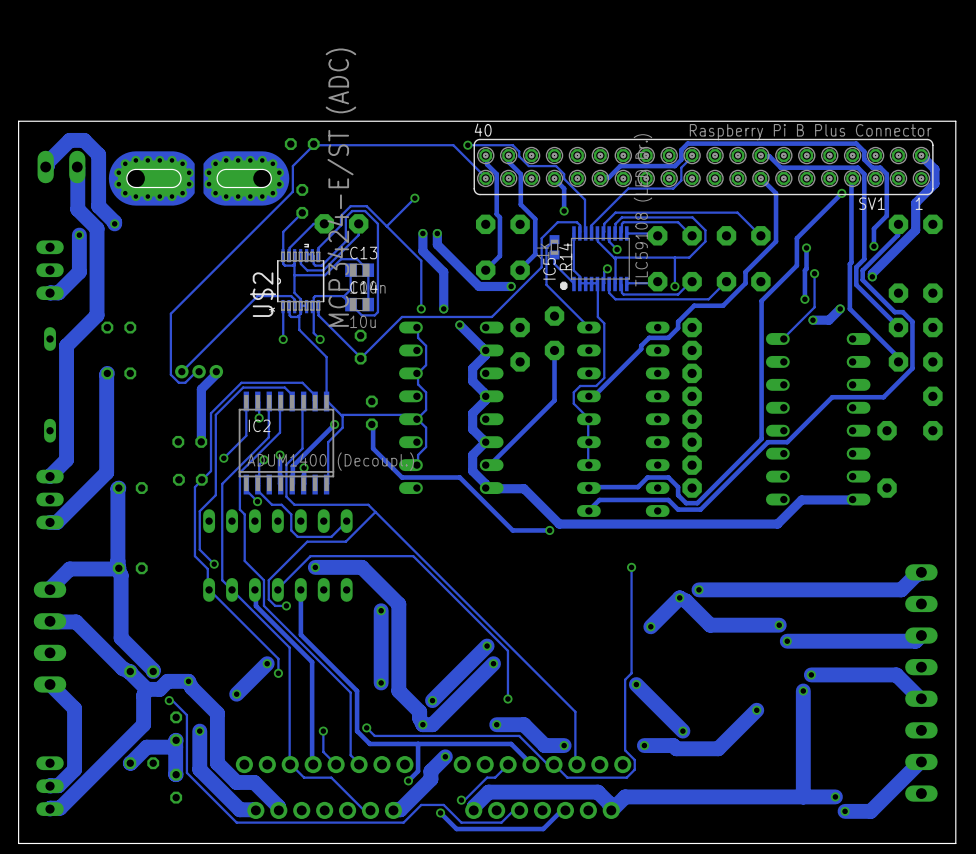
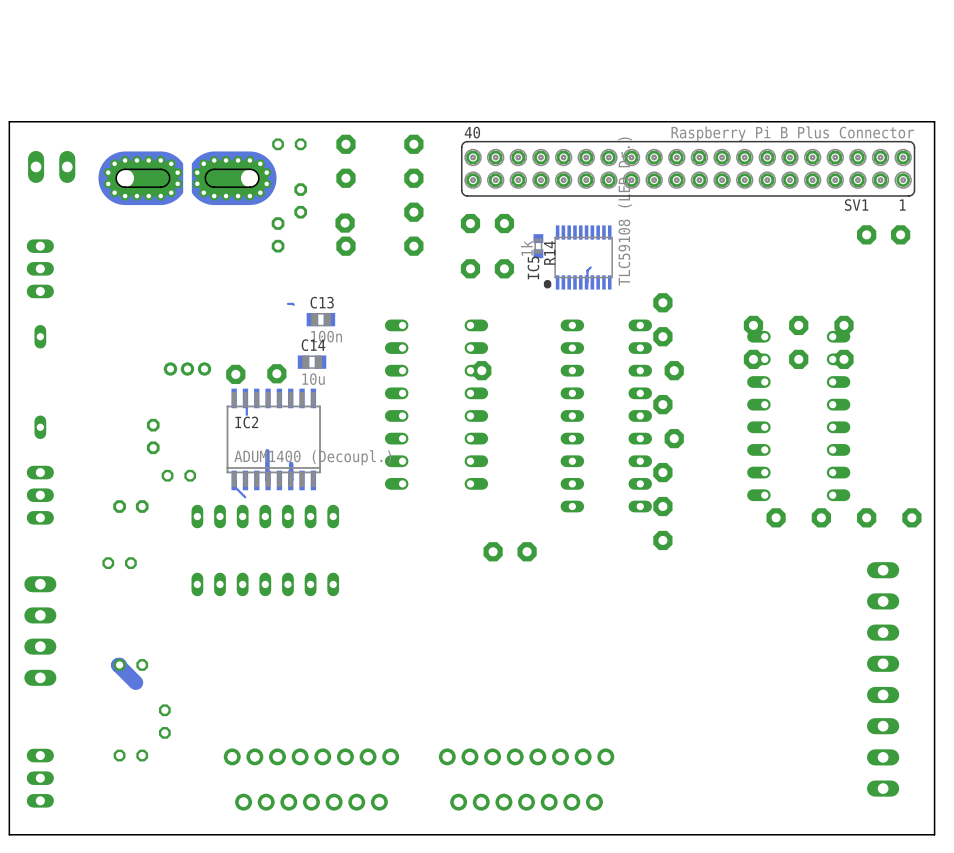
SV1 footprint: [473, 138, 934, 196] -> [461, 140, 916, 197]
part: none -> (345, 144)
part: none -> (413, 144)
track: (313, 145) (453, 145) (485, 178) -> none
track: (313, 145) (292, 166) (292, 191) (170, 313) (170, 374) (178, 382) (185, 382) (199, 371) -> none
track: (467, 145) (512, 145) (519, 151) (519, 156) (528, 166) (556, 166) (564, 174) (564, 178) (585, 199) (585, 233) -> none
via: (467, 145) -> none
track: (485, 155) (487, 164) (496, 174) (496, 214) (499, 217) (499, 255) (485, 270) -> none
track: (508, 155) (509, 162) (520, 174) (520, 204) (535, 219) (535, 254) (520, 270) -> none
track: (692, 155) (681, 167) (681, 180) (673, 188) (628, 188) (591, 225) (591, 233) -> none
track: (760, 155) (769, 156) (780, 167) (857, 167) (864, 174) (864, 259) (856, 267) (856, 284) (898, 327) -> none
track: (921, 155) (934, 169) (934, 183) (915, 203) (915, 230) (872, 273) (872, 276) -> none
track: (45, 167) (47, 162) (69, 140) (84, 140) (98, 154) (98, 206) (114, 223) -> none
track: (77, 167) (77, 209) (97, 228) (97, 315) (66, 345) (66, 459) (50, 476) -> none
part: none -> (345, 178)
part: none -> (413, 178)
track: (554, 178) (564, 188) (564, 211) -> none
track: (600, 178) (609, 177) (620, 166) (674, 166) (681, 159) (681, 150) (687, 143) (856, 143) (864, 151) (864, 159) (872, 167) (880, 167) (886, 174) (886, 215) (873, 228) (873, 246) -> none
track: (760, 178) (776, 193) (776, 241) (745, 272) (745, 283) (723, 305) (694, 305) (678, 321) (678, 328) (668, 337) (649, 337) (641, 345) (641, 349) (594, 395) (588, 396) -> none
track: (852, 178) (849, 308) (898, 357) (898, 361) -> none
track: (841, 193) (796, 238) (796, 265) (761, 300) (761, 438) (697, 503) (686, 503) (678, 495) (678, 487) (668, 477) (647, 477) (637, 487) (588, 488) -> none
via: (841, 193) -> none
track: (414, 198) (386, 226) -> none
via: (414, 198) -> none
part: (302, 201) -> none
part: none -> (300, 200)
via: (564, 211) -> none
track: (302, 212) (283, 231) (283, 264) (292, 265) (294, 255) -> none
part: none -> (413, 212)
via: (114, 223) -> none
track: (324, 223) (313, 223) (289, 247) (288, 255) -> none
part: (324, 223) -> none
track: (358, 223) (358, 235) (323, 270) (307, 270) (300, 264) (300, 255) -> none
track: (898, 224) (898, 235) (862, 270) (862, 280) (894, 312) (902, 312) (912, 321) (912, 368) (883, 397) (832, 397) (787, 442) (768, 442) (700, 509) (678, 509) (668, 499) (599, 499) (588, 510) -> none
part: (898, 224) -> none
part: (932, 224) -> none
track: (422, 233) (422, 251) (443, 272) (443, 308) -> none
via: (422, 233) -> none
track: (437, 233) (437, 244) (479, 286) (511, 286) -> none
via: (437, 233) -> none
track: (573, 233) (573, 270) (580, 276) (580, 283) -> none
track: (579, 233) (580, 225) (576, 222) (557, 222) (541, 238) (541, 267) (491, 316) (402, 316) (360, 358) (318, 315) (318, 306) -> none
track: (597, 233) (597, 241) (615, 259) (615, 284) -> none
track: (603, 233) (604, 223) (615, 212) (737, 212) (760, 235) -> none
track: (609, 233) (609, 241) (617, 249) -> none
track: (615, 233) (615, 223) (621, 217) (692, 217) (705, 230) (705, 241) (689, 257) (614, 258) -> none
track: (620, 233) (623, 222) (678, 222) (692, 235) -> none
track: (626, 233) (655, 233) (657, 235) -> none
track: (79, 235) (79, 272) (58, 292) (50, 293) -> none
via: (79, 235) -> none
part: none -> (278, 234)
part: (657, 235) -> none
part: (692, 235) -> none
part: (726, 235) -> none
part: (760, 235) -> none
part: none -> (866, 234)
part: none -> (900, 234)
track: (554, 239) (546, 247) (546, 284) (588, 327) -> none
via: (873, 246) -> none
part: none -> (345, 246)
part: none -> (413, 246)
track: (806, 247) (804, 299) -> none
via: (806, 247) -> none
via: (617, 249) -> none
track: (554, 254) (554, 264) (573, 284) -> none
track: (306, 255) (312, 254) (313, 264) (321, 265) (345, 241) (345, 217) (352, 211) (365, 211) (377, 223) (377, 312) (374, 315) (361, 315) (342, 296) (315, 296) (312, 306) (313, 333) (320, 339) -> none
track: (318, 255) (318, 247) (341, 225) (341, 215) (350, 206) (366, 206) (421, 260) (421, 308) -> none
track: (674, 257) (674, 286) -> none
track: (293, 264) (294, 292) (300, 299) (300, 313) (297, 316) (291, 316) (288, 306) -> none
via: (607, 268) -> none
track: (351, 270) (350, 289) (343, 296) -> none
C13 position: (359, 270) -> (320, 319)
track: (814, 273) (814, 307) (783, 338) -> none
via: (814, 273) -> none
track: (294, 275) (324, 275) (341, 259) (357, 259) (368, 270) (368, 304) -> none
via: (872, 276) -> none
U$2: MCP3424-E/ST (ADC) (300, 278) -> none
track: (657, 281) (626, 284) -> none
part: (657, 281) -> none
track: (692, 281) (678, 294) (623, 294) (620, 284) -> none
part: (692, 281) -> none
track: (726, 281) (708, 299) (615, 299) (609, 292) (609, 284) -> none
part: (726, 281) -> none
part: (760, 281) -> none
track: (580, 283) (597, 284) (597, 316) (604, 323) (604, 377) (596, 386) (580, 386) (573, 392) (573, 403) (588, 419) (588, 465) -> none
via: (511, 286) -> none
via: (674, 286) -> none
part: (898, 293) -> none
part: (932, 293) -> none
via: (804, 299) -> none
C14 position: (359, 304) -> (312, 362)
part: none -> (662, 302)
track: (283, 306) (283, 339) -> none
track: (294, 306) (294, 299) (291, 296) (257, 296) (181, 371) -> none
via: (421, 308) -> none
via: (443, 308) -> none
track: (840, 308) (829, 320) (812, 320) -> none
via: (840, 308) -> none
track: (298, 316) (299, 329) (326, 357) (326, 401) (342, 416) (342, 427) (328, 442) (328, 483) (326, 484) -> none
part: (554, 316) -> none
via: (812, 320) -> none
track: (459, 325) (485, 350) (485, 355) (472, 368) (472, 381) (485, 396) (485, 400) (472, 413) (472, 429) (485, 442) (472, 455) (472, 471) (485, 483) (485, 488) (524, 488) (559, 524) (777, 524) (801, 499) (852, 499) -> none
via: (459, 325) -> none
part: (118, 327) -> none
track: (416, 327) (418, 337) (426, 345) (426, 365) (416, 373) (418, 384) (426, 392) (426, 410) (416, 419) -> none
part: (520, 327) -> none
part: (692, 327) -> none
part: none -> (753, 325)
part: none -> (798, 325)
part: none -> (844, 325)
part: (898, 327) -> none
part: (932, 327) -> none
part: none -> (662, 336)
via: (283, 339) -> none
via: (320, 339) -> none
part: (360, 347) -> none
track: (554, 350) (554, 400) (490, 464) (485, 465) -> none
part: (554, 350) -> none
part: (692, 350) -> none
part: (520, 361) -> none
part: none -> (753, 359)
part: none -> (798, 359)
part: none -> (844, 359)
part: (898, 361) -> none
part: (932, 361) -> none
track: (216, 371) (217, 373) (201, 389) (201, 441) -> none
track: (107, 373) (106, 472) (56, 522) (50, 522) -> none
part: (118, 373) -> none
part: none -> (481, 370)
part: none -> (276, 373)
part: none -> (235, 374)
part: (692, 396) -> none
part: (932, 396) -> none
track: (246, 401) (246, 435) (223, 458) -> none
track: (269, 401) (268, 437) (222, 483) (222, 580) (231, 589) -> none
track: (280, 401) (280, 432) (239, 472) (239, 509) (244, 514) (244, 560) (263, 580) (263, 605) (350, 692) (350, 755) (359, 764) -> none
track: (292, 401) (291, 394) (284, 387) (243, 387) (215, 414) (215, 495) (199, 511) (199, 549) (214, 564) -> none
track: (303, 401) (302, 448) (286, 464) (286, 496) (294, 504) (368, 504) (575, 711) (576, 764) -> none
track: (315, 401) (313, 394) (302, 382) (241, 382) (211, 413) (211, 471) (194, 487) (194, 556) (207, 568) (207, 589) (278, 658) (278, 673) -> none
part: none -> (662, 404)
part: (371, 412) -> none
track: (341, 415) (413, 414) (416, 419) -> none
via: (259, 418) -> none
track: (416, 419) (426, 427) (426, 446) (418, 455) (416, 465) -> none
part: (692, 419) -> none
track: (334, 424) (292, 466) (292, 484) -> none
via: (334, 424) -> none
track: (371, 424) (373, 448) (402, 477) (459, 477) (512, 530) (549, 530) -> none
part: (887, 430) -> none
part: (932, 430) -> none
part: none -> (153, 436)
part: (189, 441) -> none
via: (280, 455) -> none
via: (223, 458) -> none
track: (263, 459) (259, 464) (259, 491) (272, 504) (281, 504) (291, 514) (291, 530) (297, 536) (331, 536) (346, 521) -> none
via: (263, 459) -> none
part: (692, 465) -> none
via: (304, 467) -> none
part: none -> (662, 472)
track: (118, 488) (117, 568) -> none
part: (130, 488) -> none
part: (692, 488) -> none
part: (887, 488) -> none
via: (257, 501) -> none
part: none -> (130, 506)
part: none -> (662, 506)
track: (375, 512) (345, 541) (307, 541) (268, 580) (268, 599) (275, 605) (286, 605) -> none
part: none -> (776, 517)
part: none -> (821, 517)
part: none -> (866, 517)
part: none -> (911, 517)
via: (549, 530) -> none
part: none -> (662, 540)
part: none -> (493, 551)
part: none -> (527, 551)
via: (214, 564) -> none
track: (315, 567) (361, 567) (398, 604) (398, 690) (419, 711) (419, 718) (422, 724) (432, 724) (493, 663) -> none
via: (315, 567) -> none
track: (631, 567) (631, 673) (625, 679) (625, 750) (634, 760) (634, 769) (626, 777) (567, 777) (552, 763) (546, 763) (519, 735) (374, 735) (366, 727) -> none
via: (631, 567) -> none
track: (117, 568) (69, 568) (50, 589) -> none
track: (117, 568) (121, 575) (121, 638) (153, 671) -> none
track: (921, 572) (917, 573) (901, 589) (698, 589) -> none
track: (232, 589) (289, 647) (290, 764) (304, 777) (331, 777) (363, 809) (370, 810) -> none
track: (254, 589) (255, 605) (312, 662) (313, 764) -> none
track: (277, 589) (310, 556) (413, 556) (507, 650) (507, 699) -> none
track: (300, 589) (300, 634) (357, 690) (357, 731) (369, 743) (511, 743) (531, 764) -> none
via: (698, 589) -> none
via: (679, 597) -> none
via: (286, 605) -> none
track: (381, 610) (381, 682) -> none
via: (381, 610) -> none
track: (50, 621) (76, 621) (122, 668) (129, 671) -> none
track: (779, 625) (710, 625) (686, 601) (679, 597) (650, 626) -> none
via: (779, 625) -> none
via: (650, 626) -> none
track: (921, 635) (915, 641) (787, 641) -> none
via: (787, 641) -> none
track: (487, 646) (432, 700) -> none
via: (487, 646) -> none
track: (267, 663) (236, 694) -> none
via: (267, 663) -> none
via: (493, 663) -> none
via: (278, 673) -> none
track: (811, 674) (896, 674) (921, 698) -> none
via: (811, 674) -> none
via: (188, 681) -> none
via: (381, 682) -> none
part: (921, 682) -> none
track: (50, 684) (74, 708) (74, 769) (58, 785) (50, 786) -> none
track: (636, 684) (682, 731) -> none
via: (636, 684) -> none
part: none -> (883, 679)
track: (803, 690) (803, 796) -> none
via: (803, 690) -> none
via: (236, 694) -> none
via: (507, 699) -> none
track: (169, 700) (172, 700) (186, 715) (186, 772) (236, 822) (403, 822) (421, 804) (443, 804) (461, 822) (501, 822) (512, 811) (519, 810) -> none
via: (169, 700) -> none
via: (432, 700) -> none
track: (756, 710) (718, 748) (676, 748) (673, 745) (644, 745) -> none
via: (756, 710) -> none
via: (422, 724) -> none
track: (496, 724) (524, 724) (544, 745) (564, 745) -> none
via: (496, 724) -> none
via: (366, 727) -> none
track: (199, 731) (199, 769) (239, 809) (255, 810) -> none
via: (199, 731) -> none
track: (323, 731) (323, 751) (336, 764) -> none
via: (323, 731) -> none
via: (682, 731) -> none
track: (176, 740) (176, 774) -> none
track: (418, 743) (418, 771) (408, 780) -> none
via: (564, 745) -> none
via: (644, 745) -> none
track: (175, 747) (146, 747) (130, 763) -> none
track: (445, 756) (430, 771) (430, 779) (400, 809) (393, 810) -> none
via: (445, 756) -> none
track: (921, 761) (870, 811) (845, 811) -> none
track: (508, 764) (495, 777) (487, 777) (464, 800) (461, 800) -> none
via: (408, 780) -> none
part: (176, 786) -> none
track: (835, 796) (625, 796) (611, 810) (609, 803) (597, 792) (488, 792) (474, 806) (473, 810) -> none
via: (835, 796) -> none
via: (461, 800) -> none
track: (50, 809) (60, 808) (143, 724) (143, 695) (146, 689) (159, 689) (167, 681) (188, 681) (191, 687) (217, 713) (217, 763) (236, 782) (254, 782) (278, 806) (278, 810) -> none
track: (565, 810) (560, 811) (543, 829) (456, 829) (440, 812) -> none
via: (845, 811) -> none
via: (440, 812) -> none

